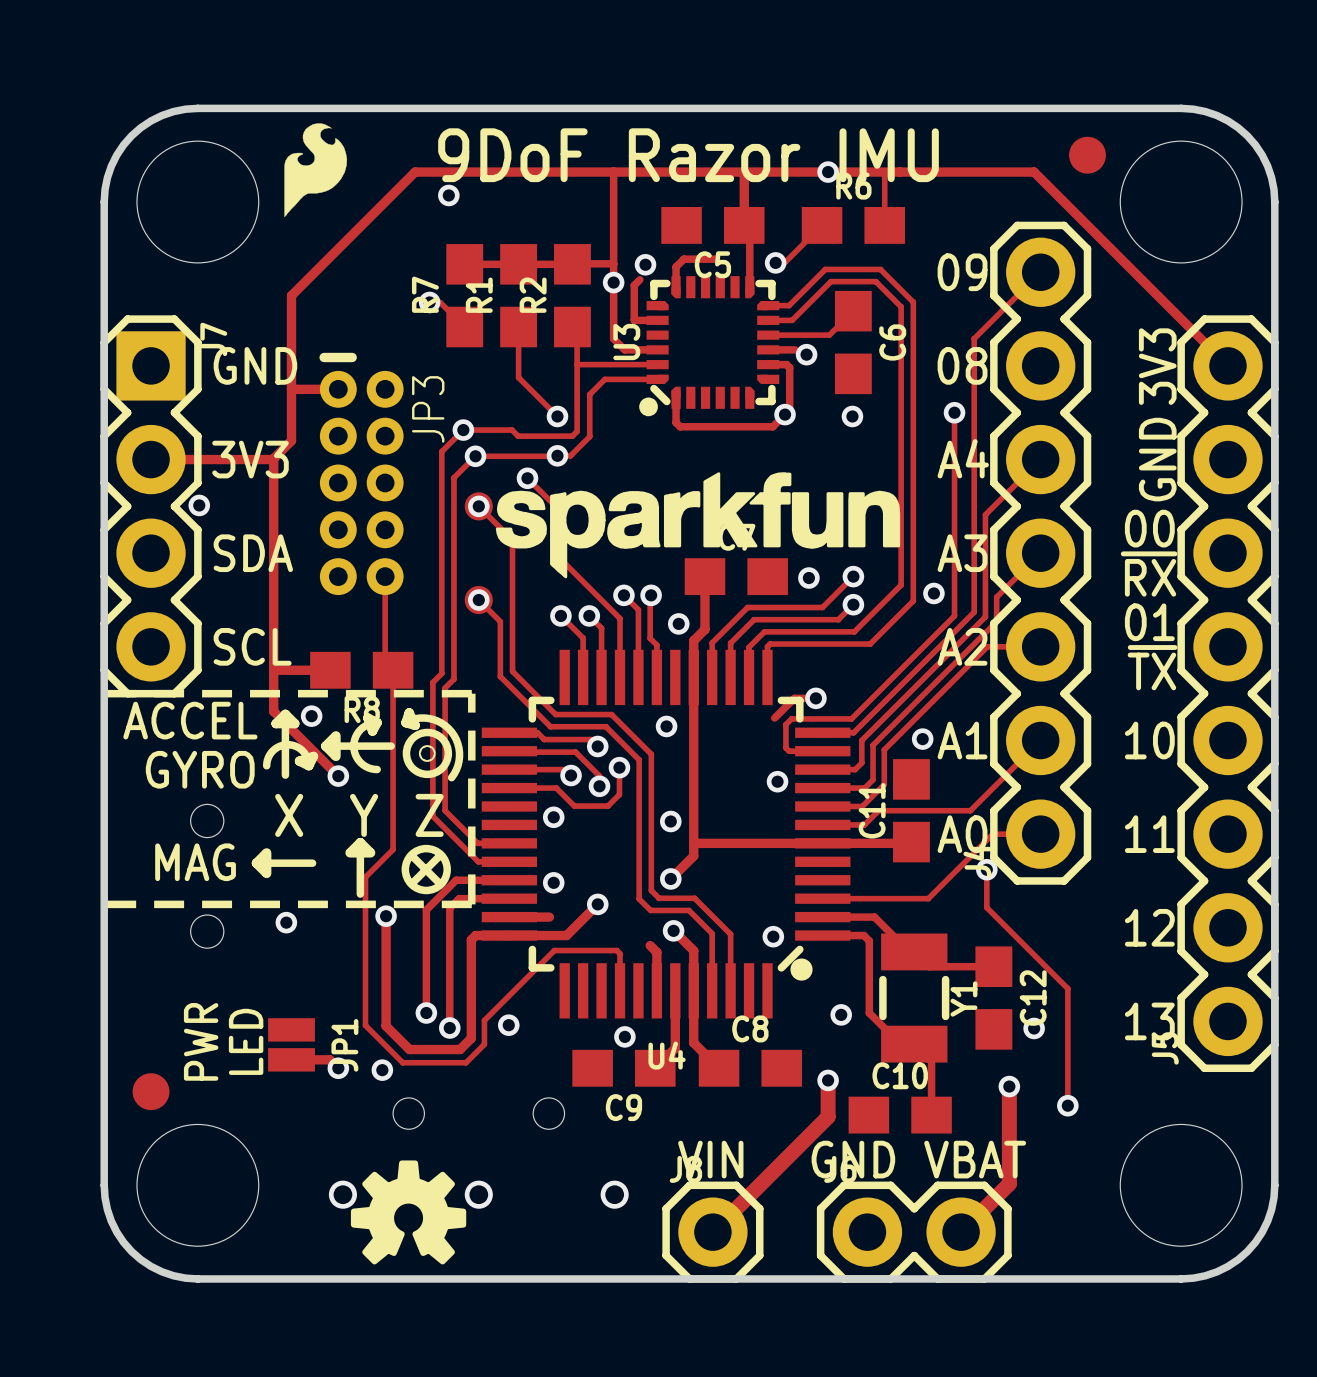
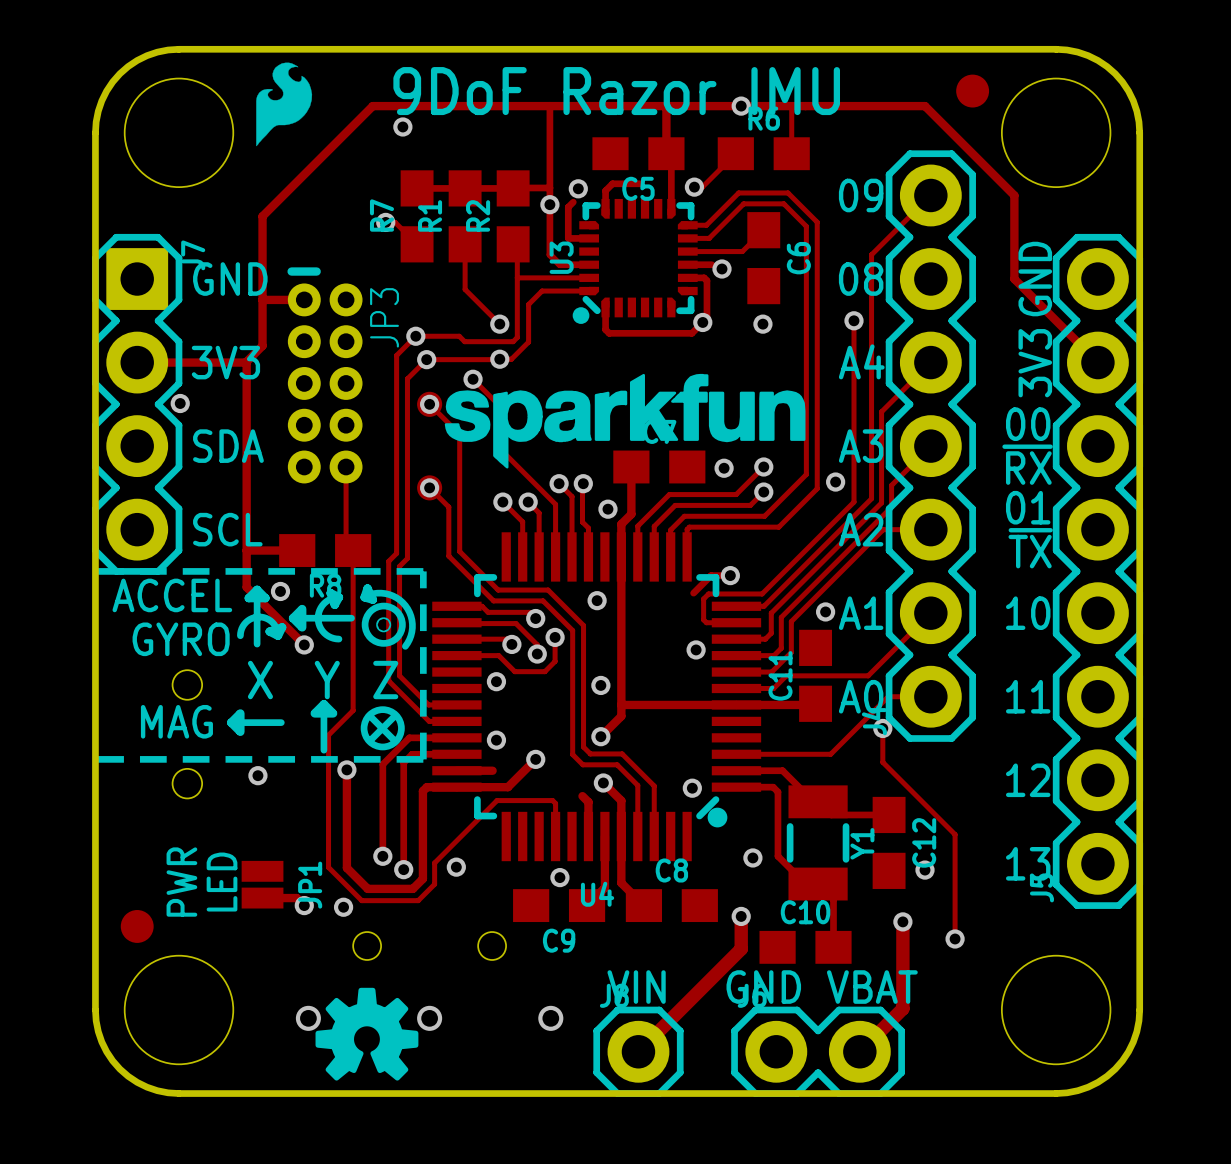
track: (1134, 272) (1227, 365) -> (1014, 195) (1014, 279) (1097, 362)
text: 3V3 (1157, 366) -> GND (1035, 279)
text: GND (1157, 459) -> 3V3 (1035, 363)

